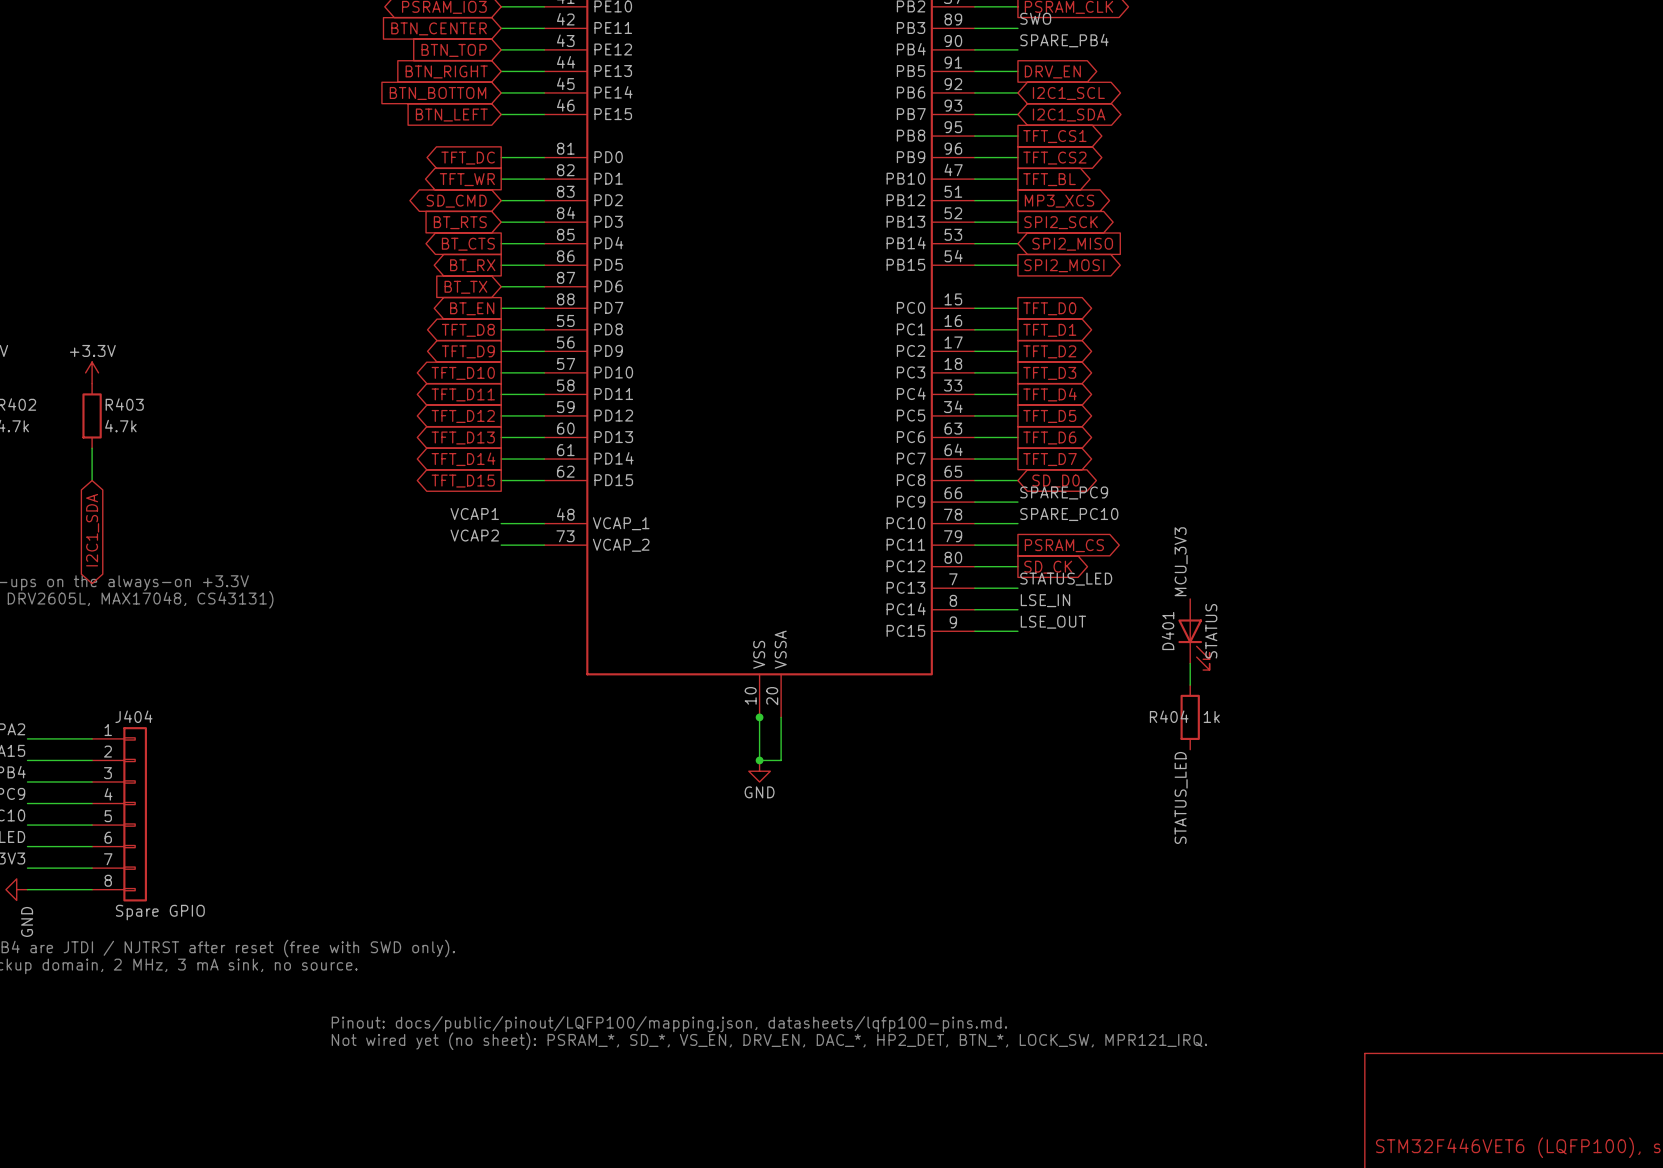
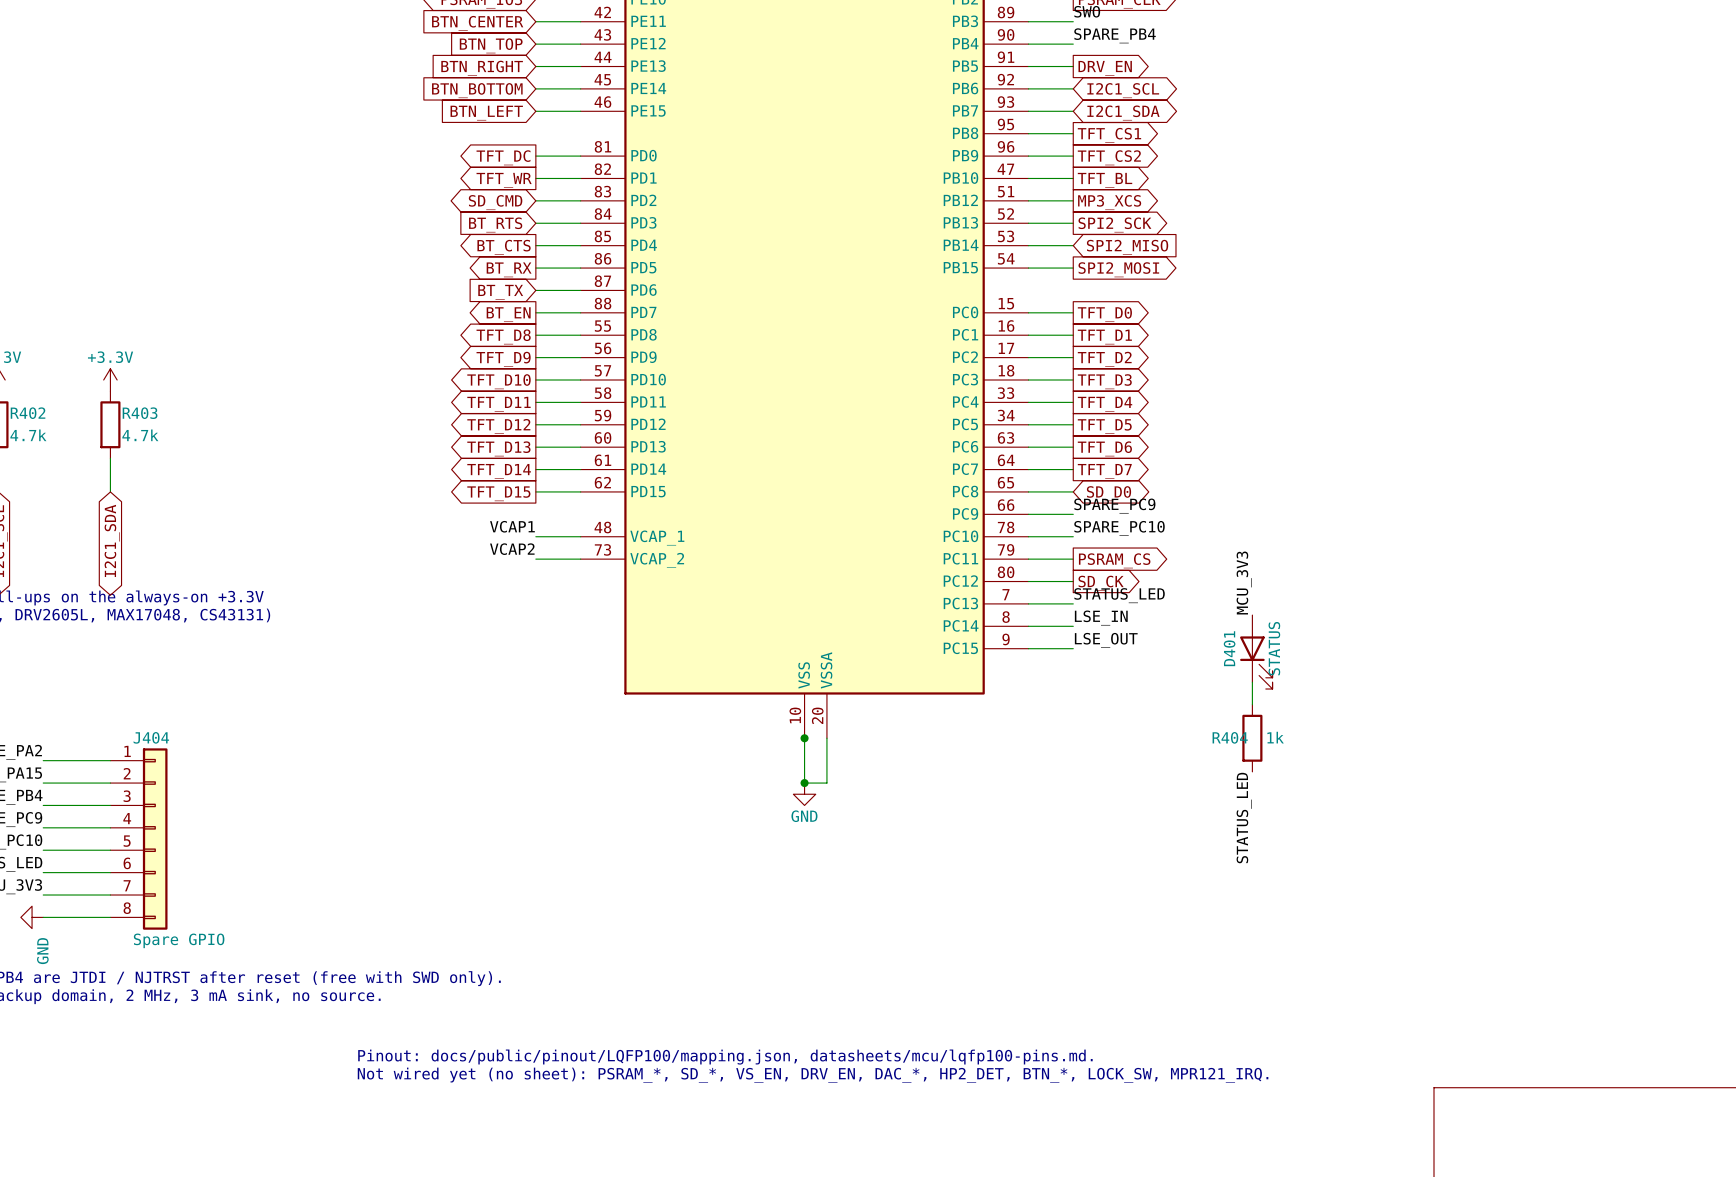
text: Pinout: docs/public/pinout/LQFP100/mapping.json, datasheets/lqfp100-pins.md. (669, 1024) -> Pinout: docs/public/pinout/LQFP100/mapping.json, datasheets/mcu/lqfp100-pins.md. (725, 1057)

